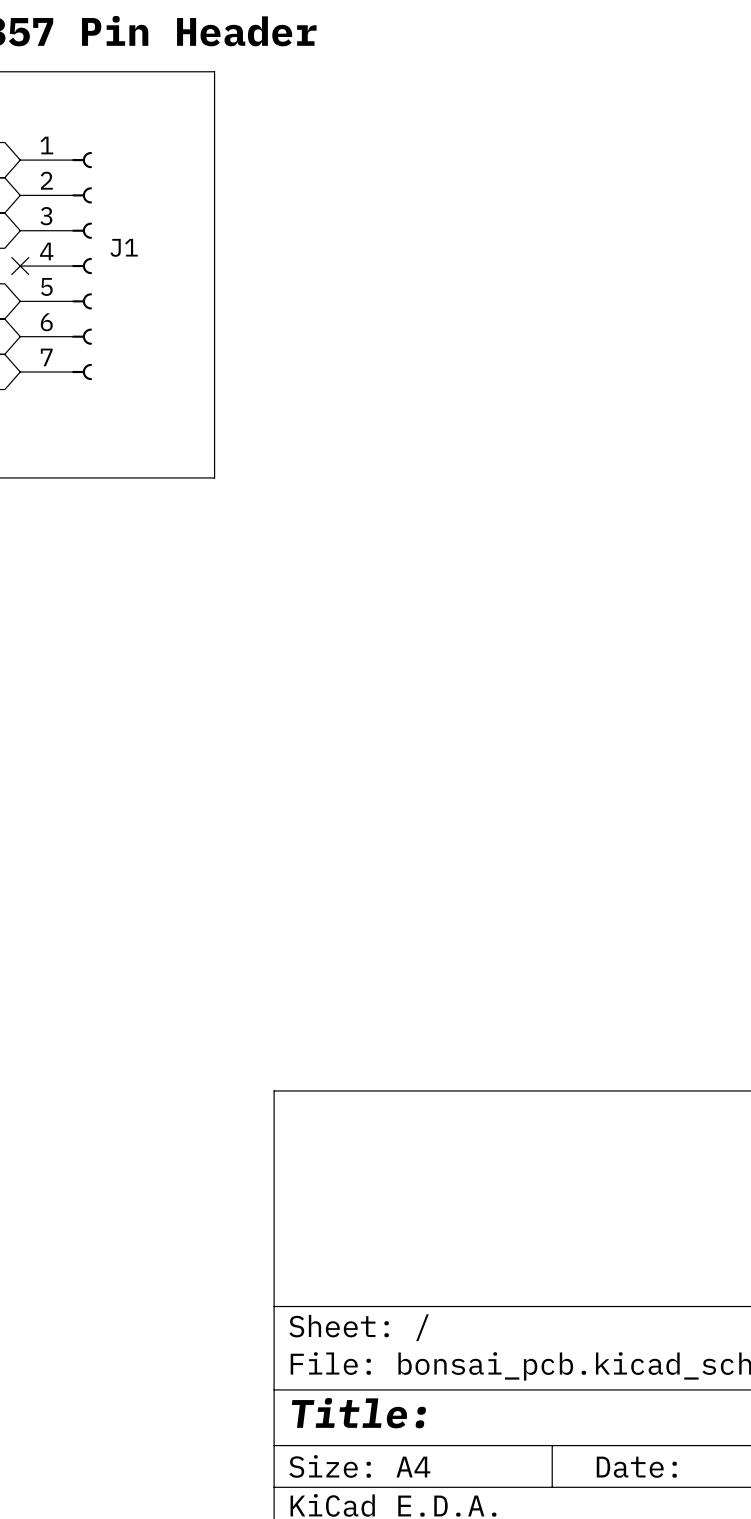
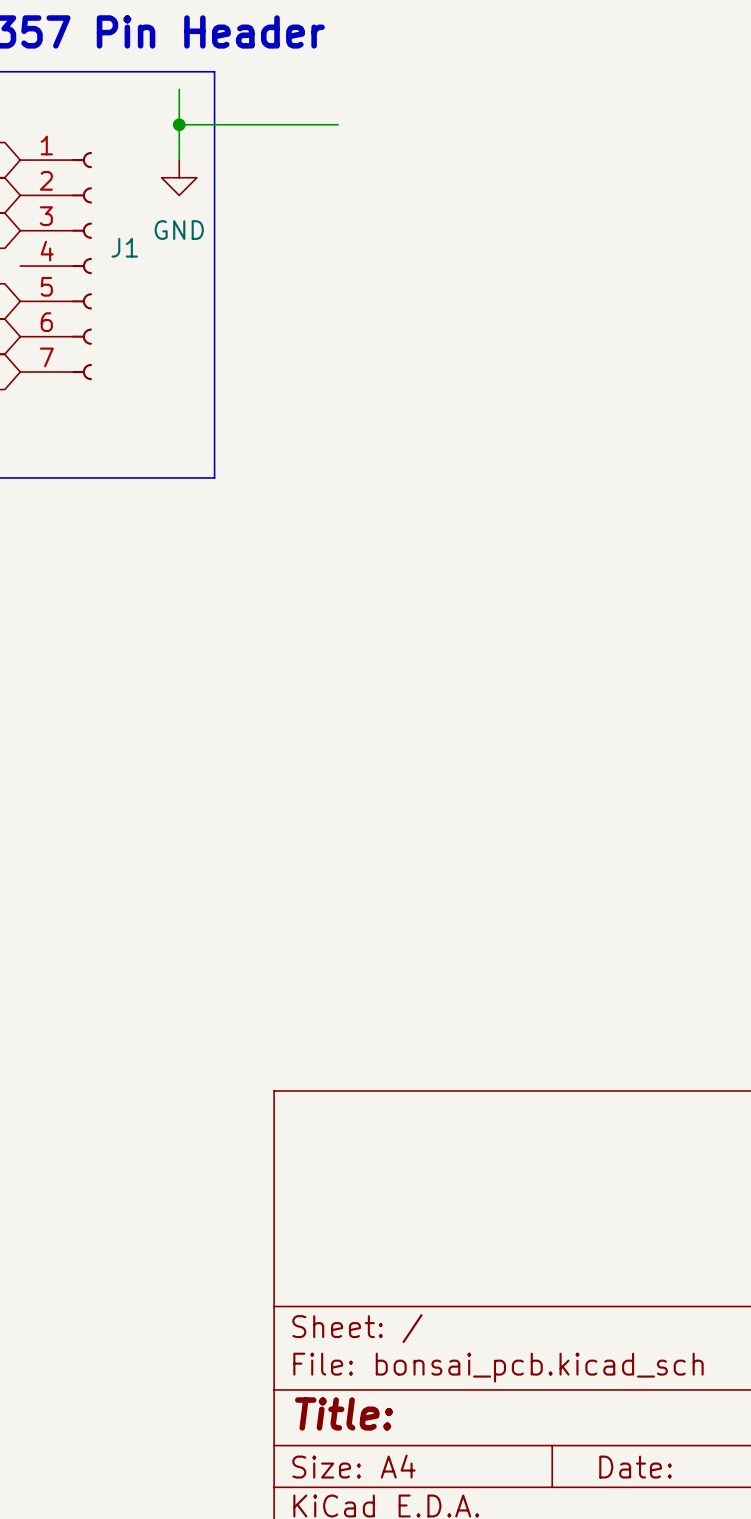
wire: none -> (179, 89) (179, 160)
wire: none -> (179, 124) (338, 124)
junction: none -> (179, 124)
power symbol: none -> GND (179, 177)
no-connect mark: (20, 266) -> none

